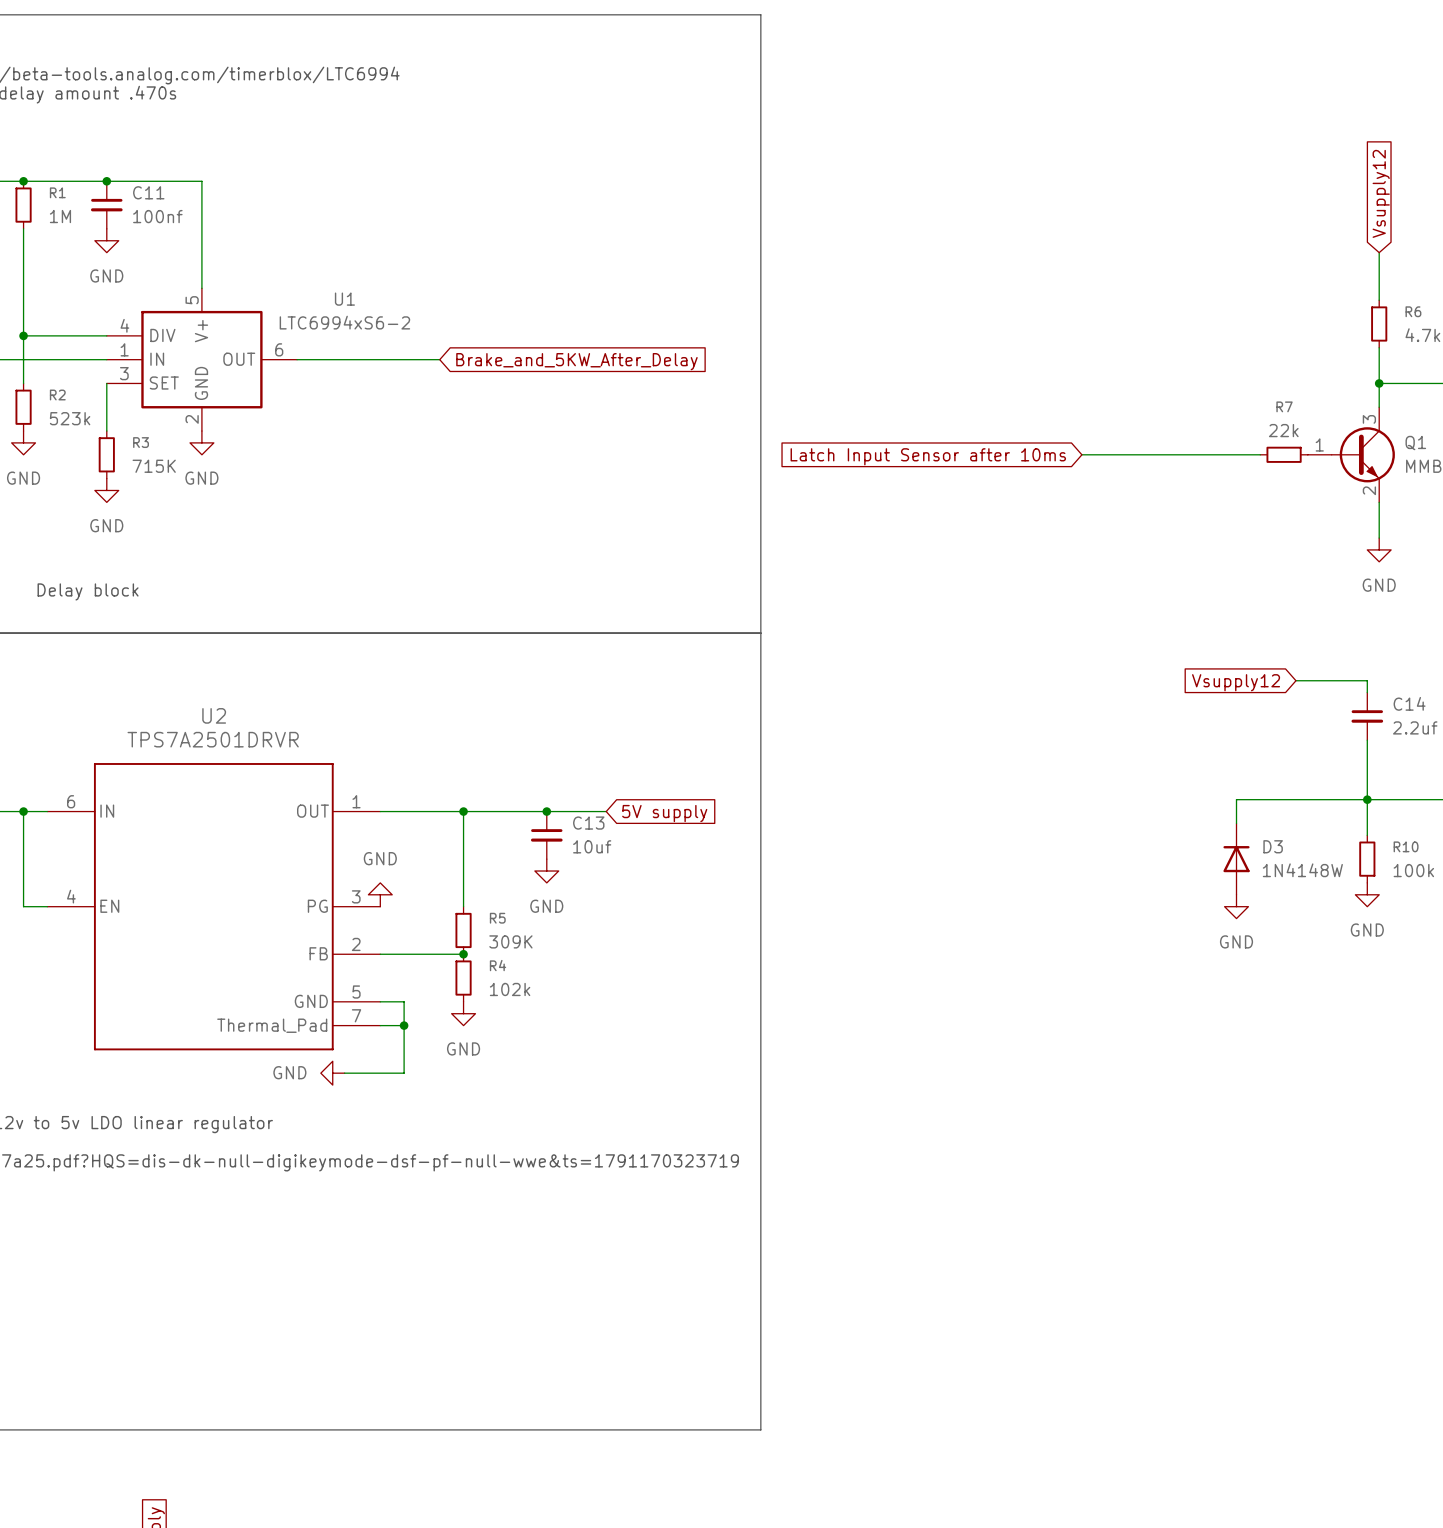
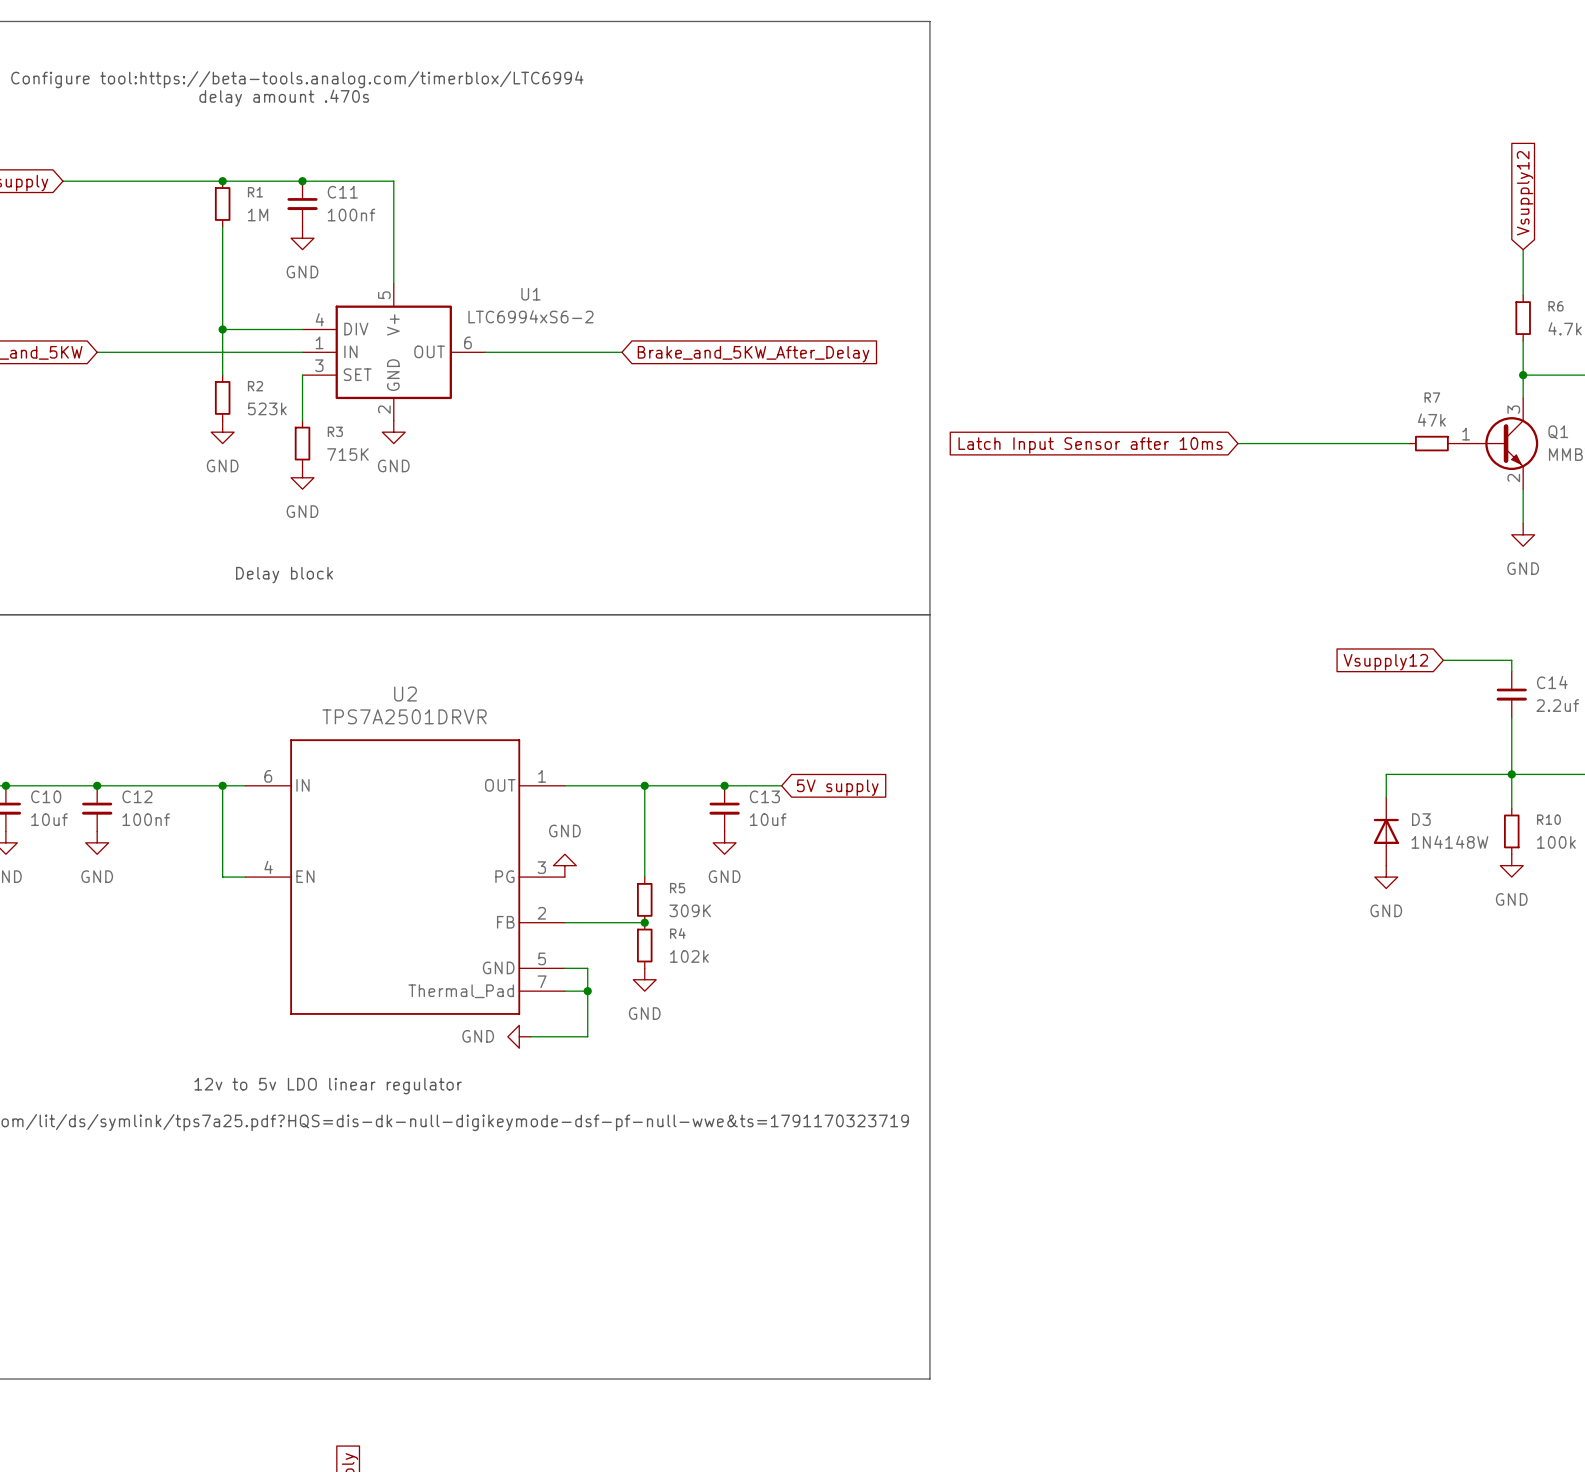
R7 value: 22k (1283, 430) -> 47k (1431, 420)

